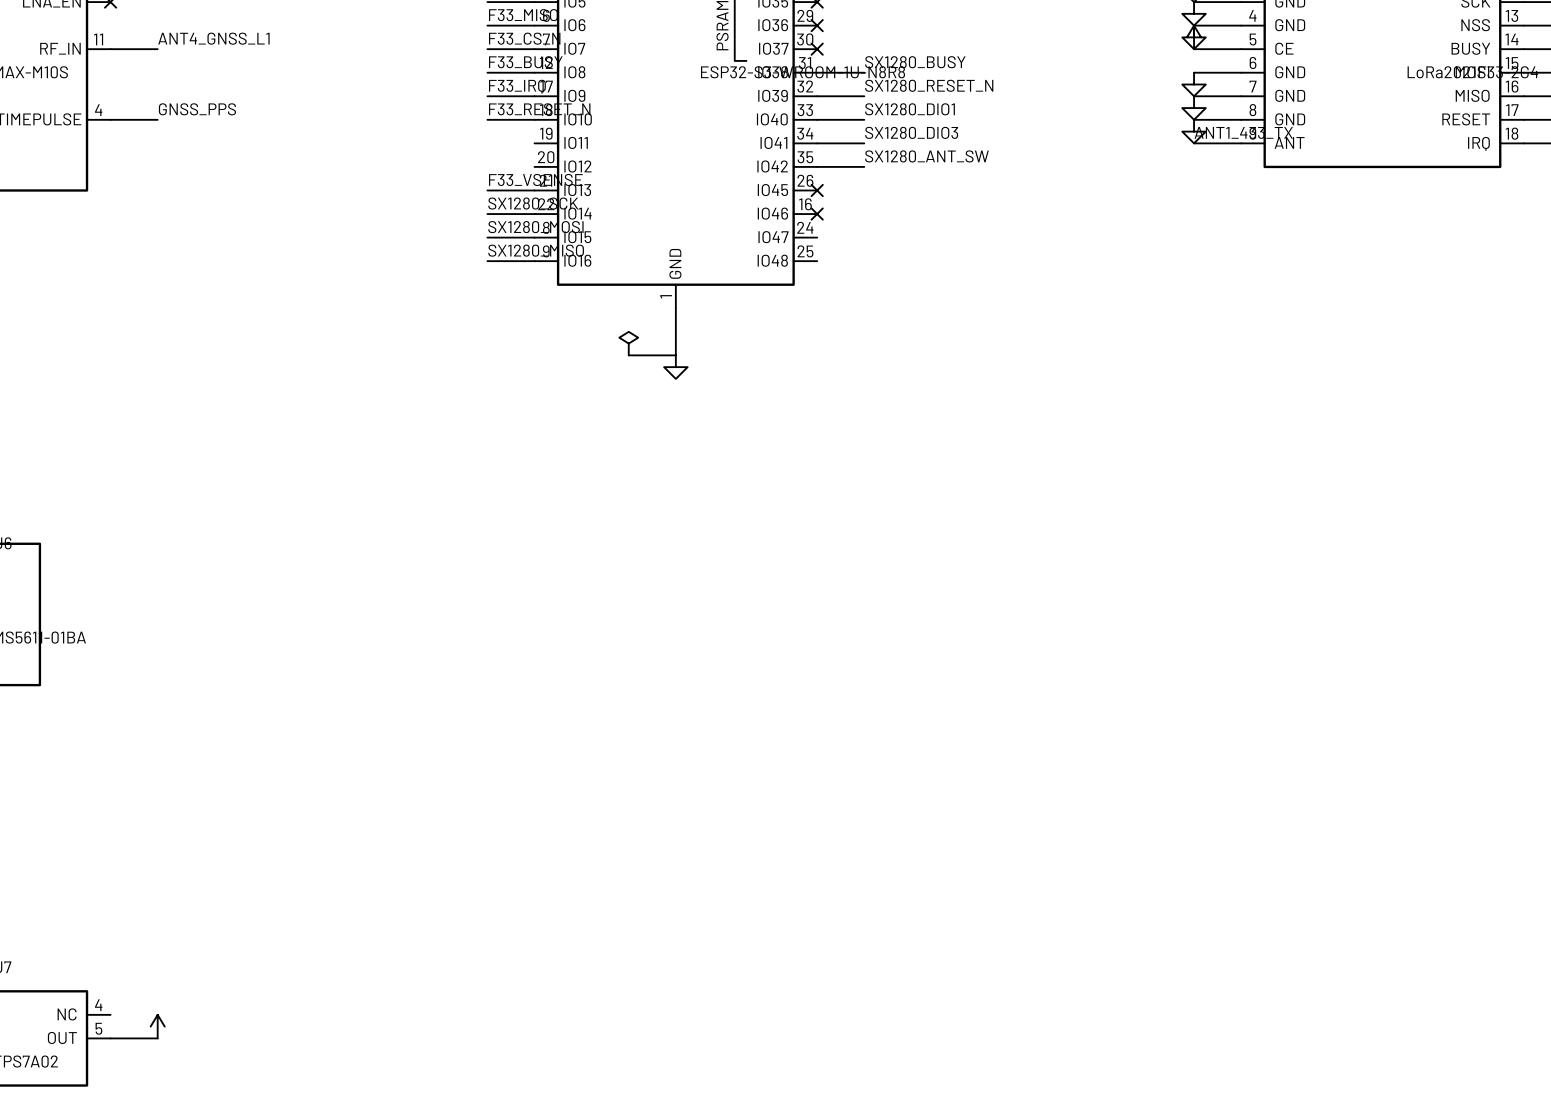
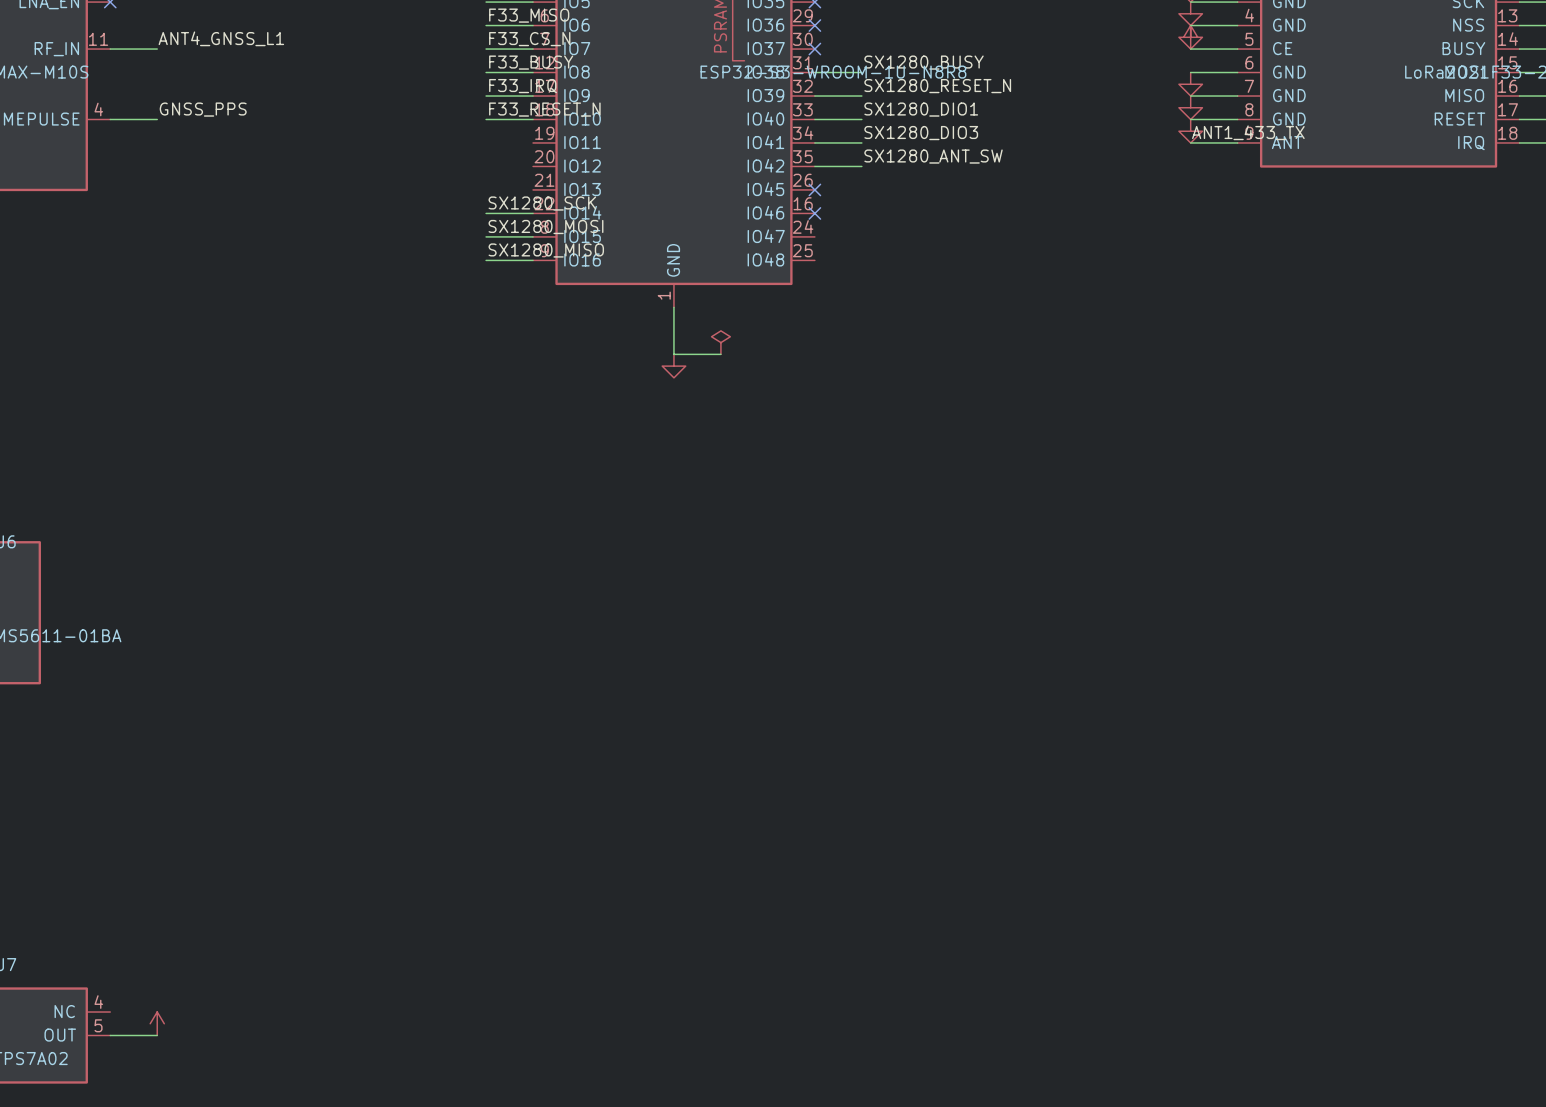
label: F33_VSENSE (535, 179) -> none
wire: (487, 190) (534, 190) -> none
power symbol position: (628, 343) -> (720, 342)
wire: (628, 355) (675, 355) -> (720, 354) (673, 354)

